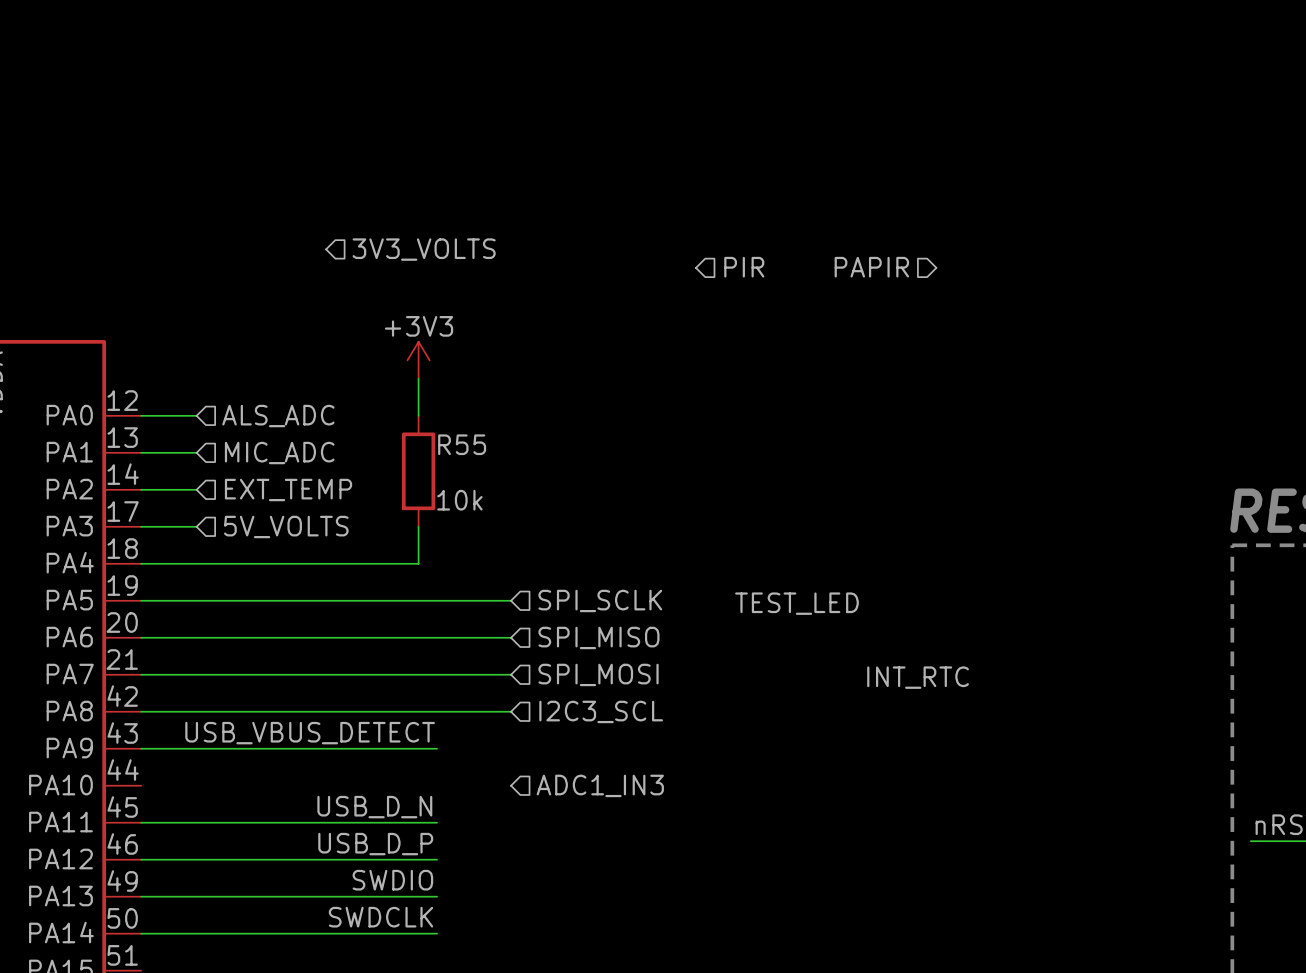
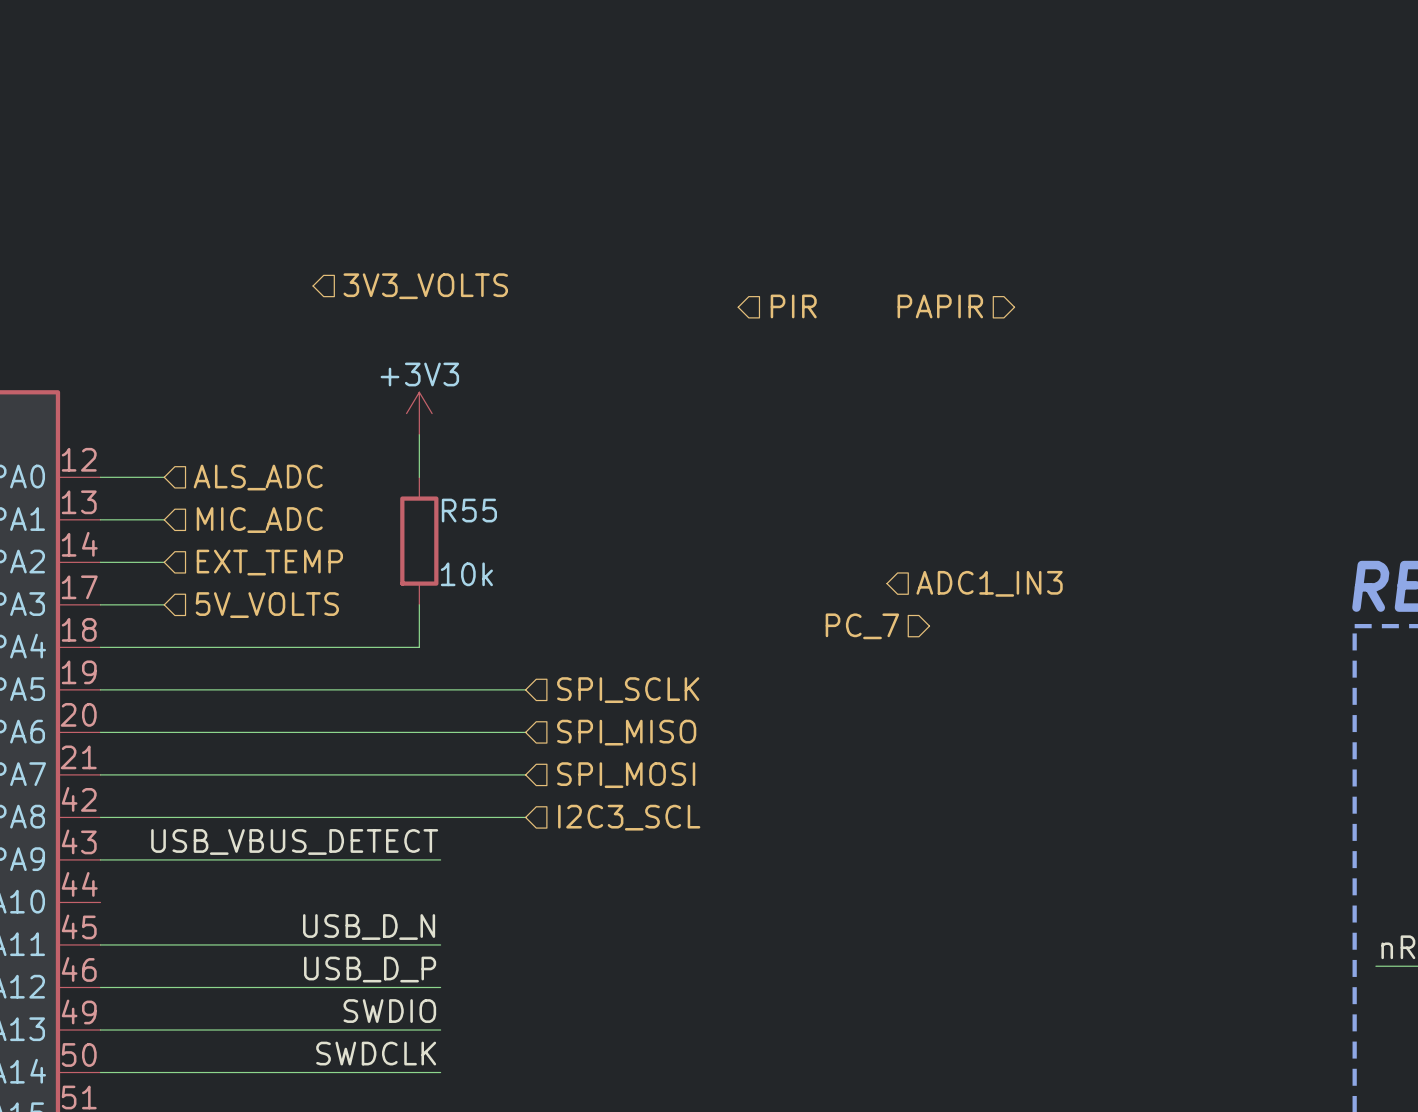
hierarchical label: none -> ADC1_IN3 (989, 583)
hierarchical label: none -> PC_7 (862, 626)
label: TEST_LED (796, 603) -> none
label: INT_RTC (918, 677) -> none
hierarchical label: ADC1_IN3 (600, 785) -> none

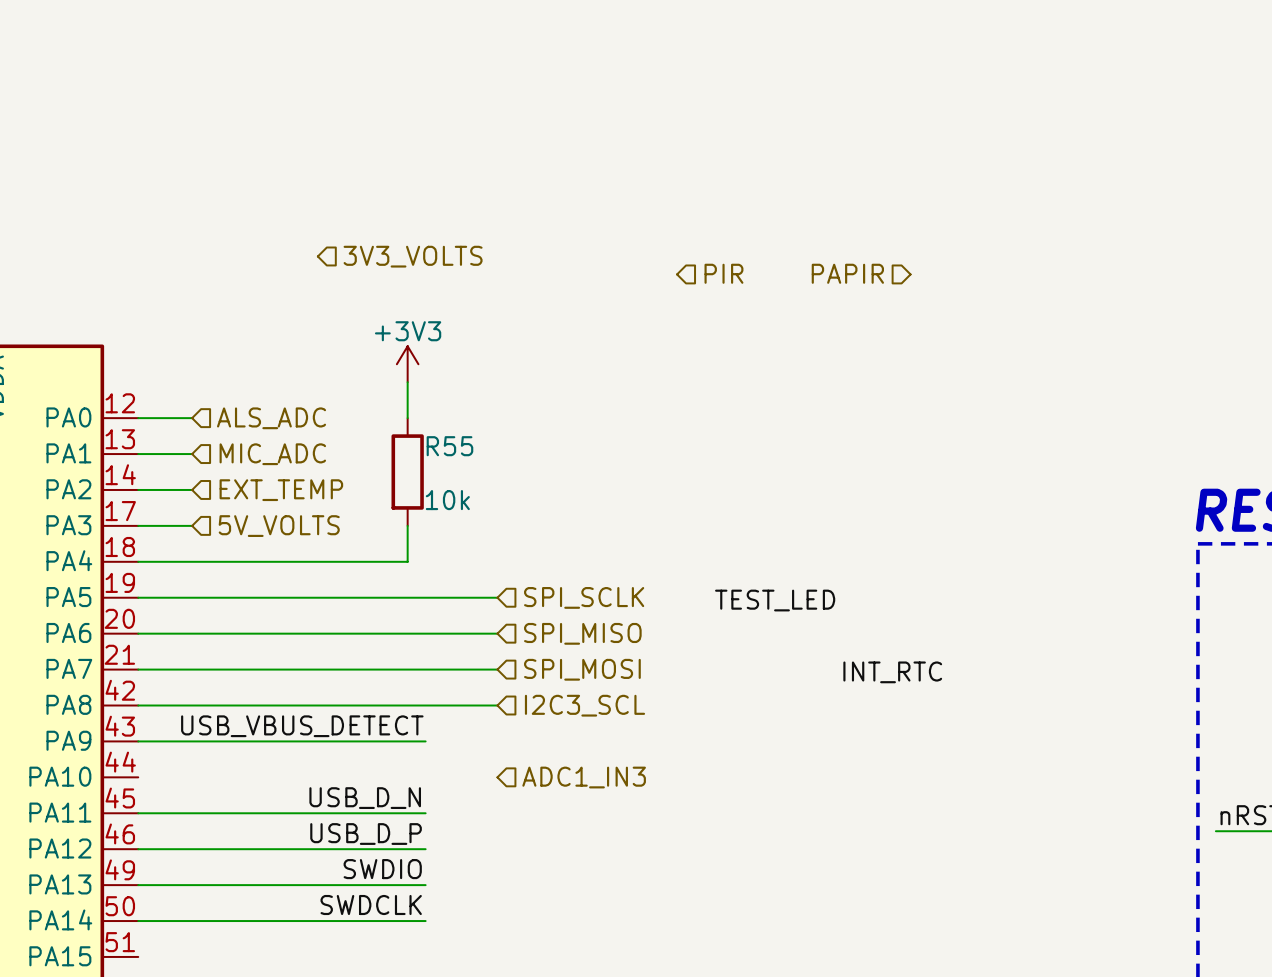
hierarchical label: ADC1_IN3 (989, 583) -> none
hierarchical label: PC_7 (862, 626) -> none
label: none -> TEST_LED (775, 600)
label: none -> INT_RTC (892, 672)
hierarchical label: none -> ADC1_IN3 (584, 777)

